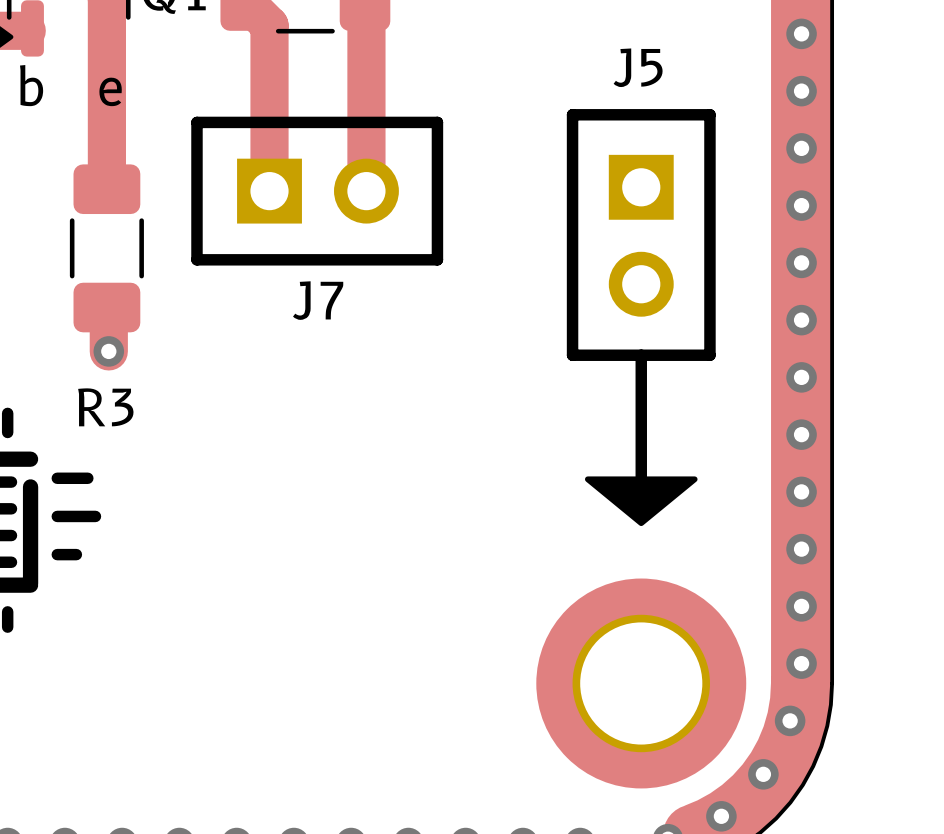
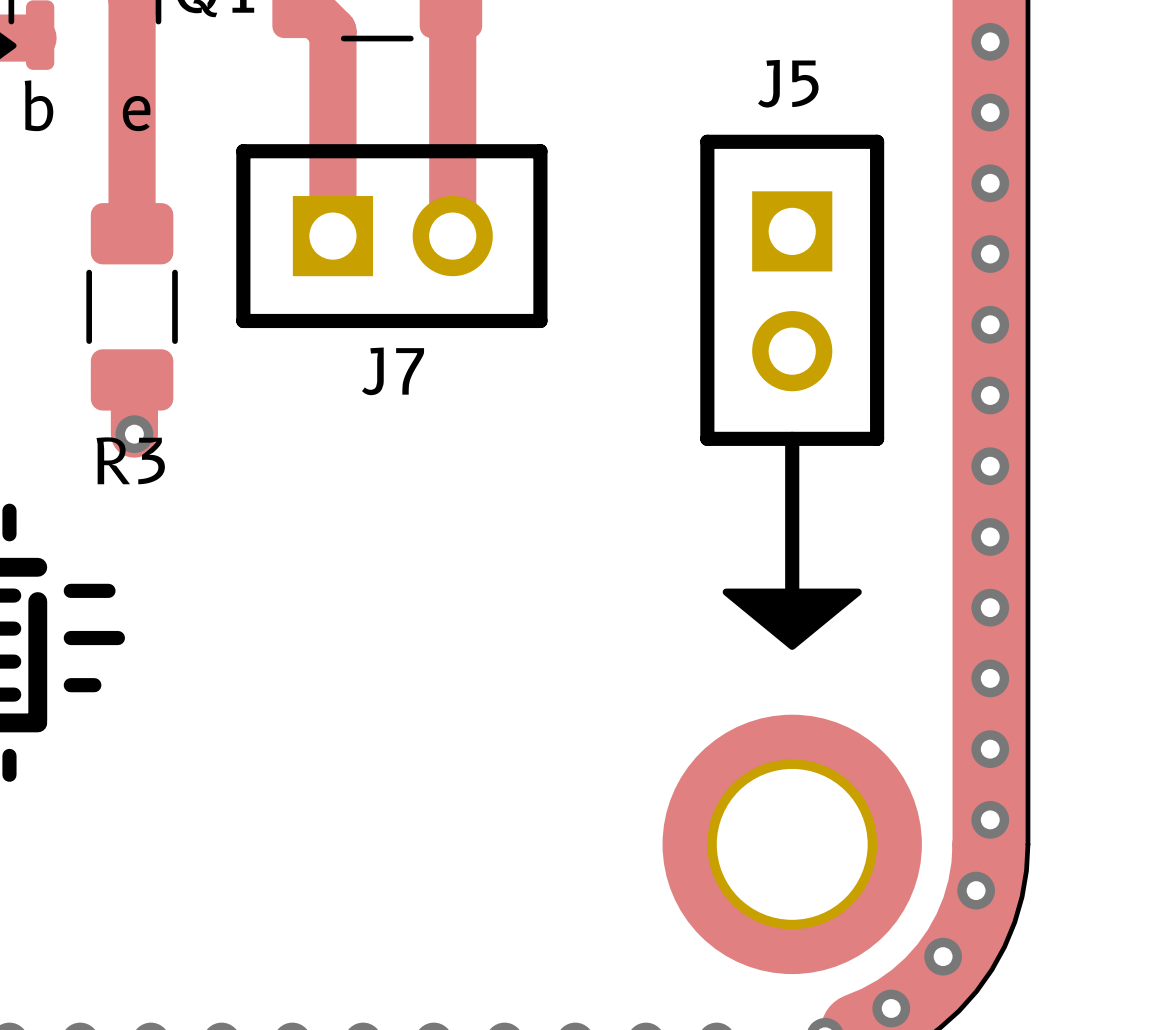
R3 name position: R3 (105, 407) -> R3 (130, 460)

